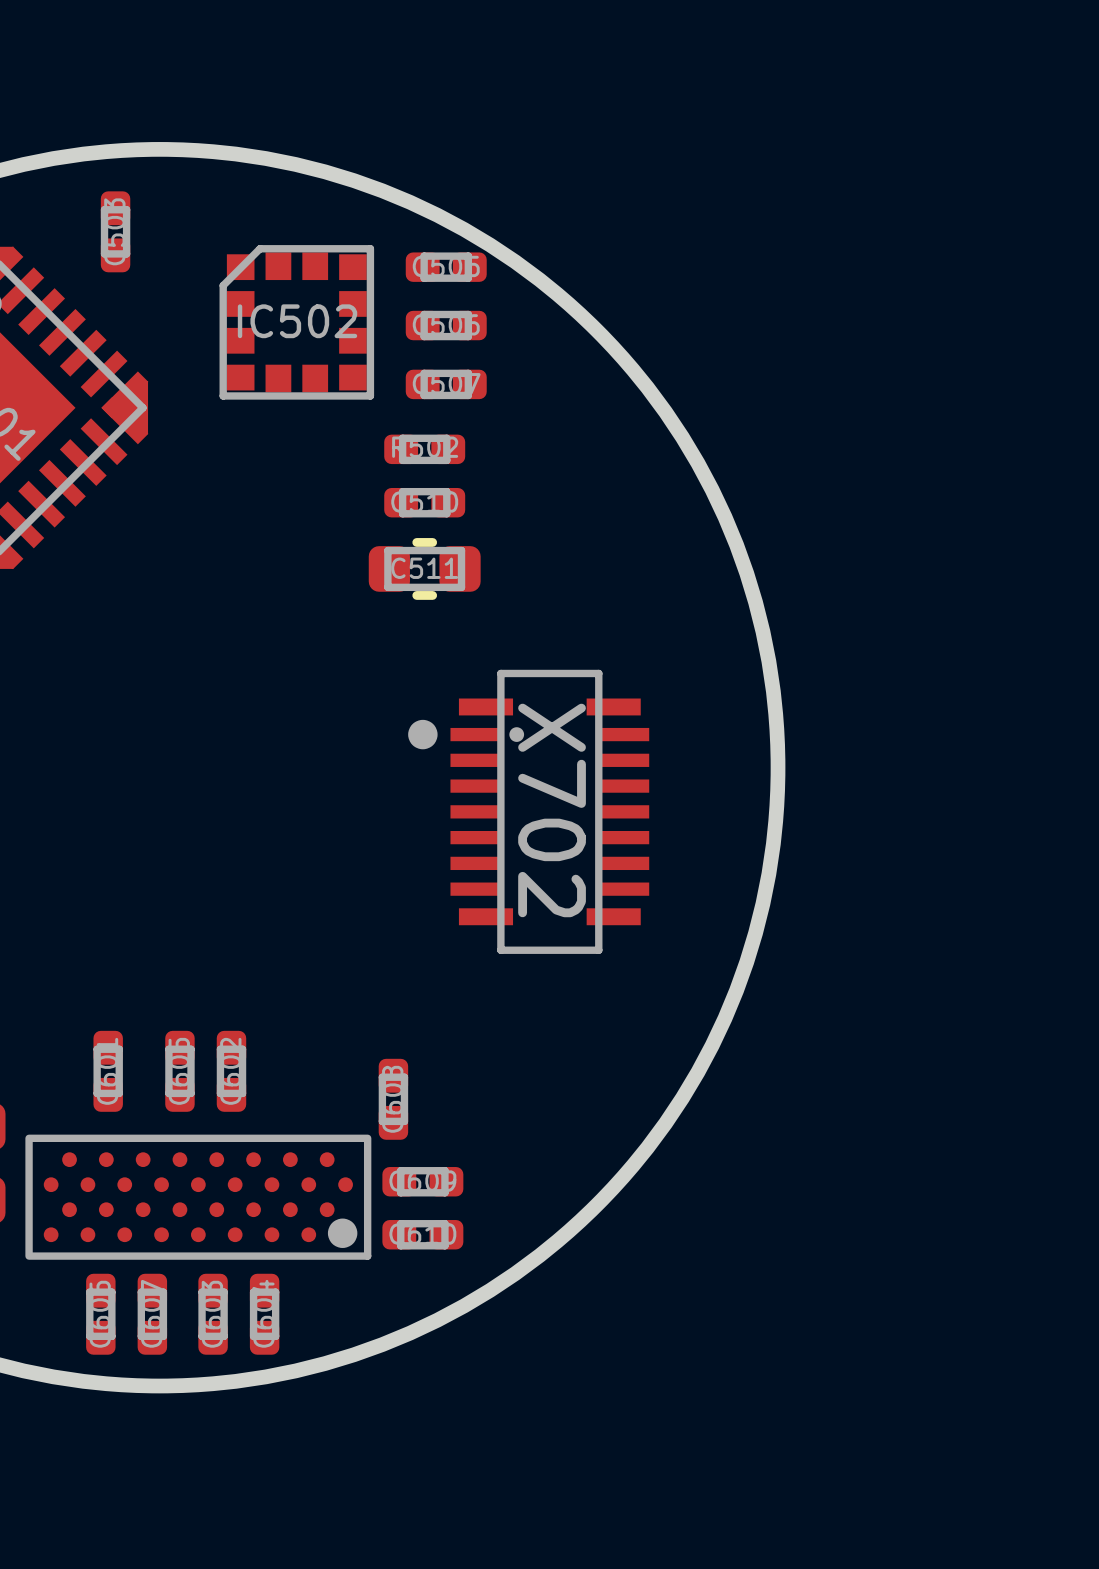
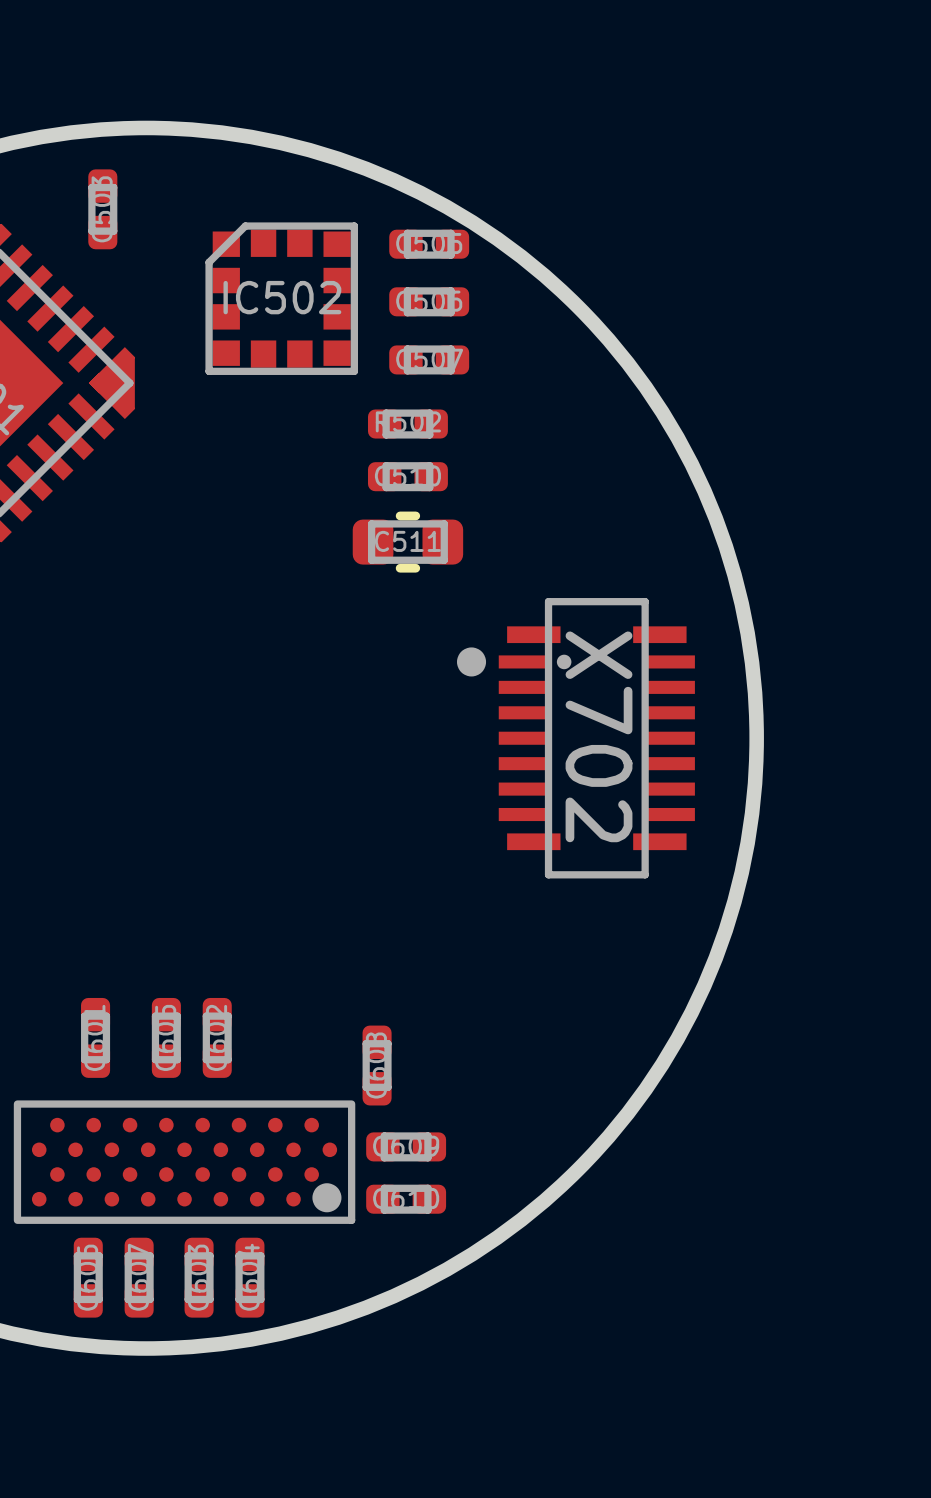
X702 position: (528, 811) -> (575, 738)

